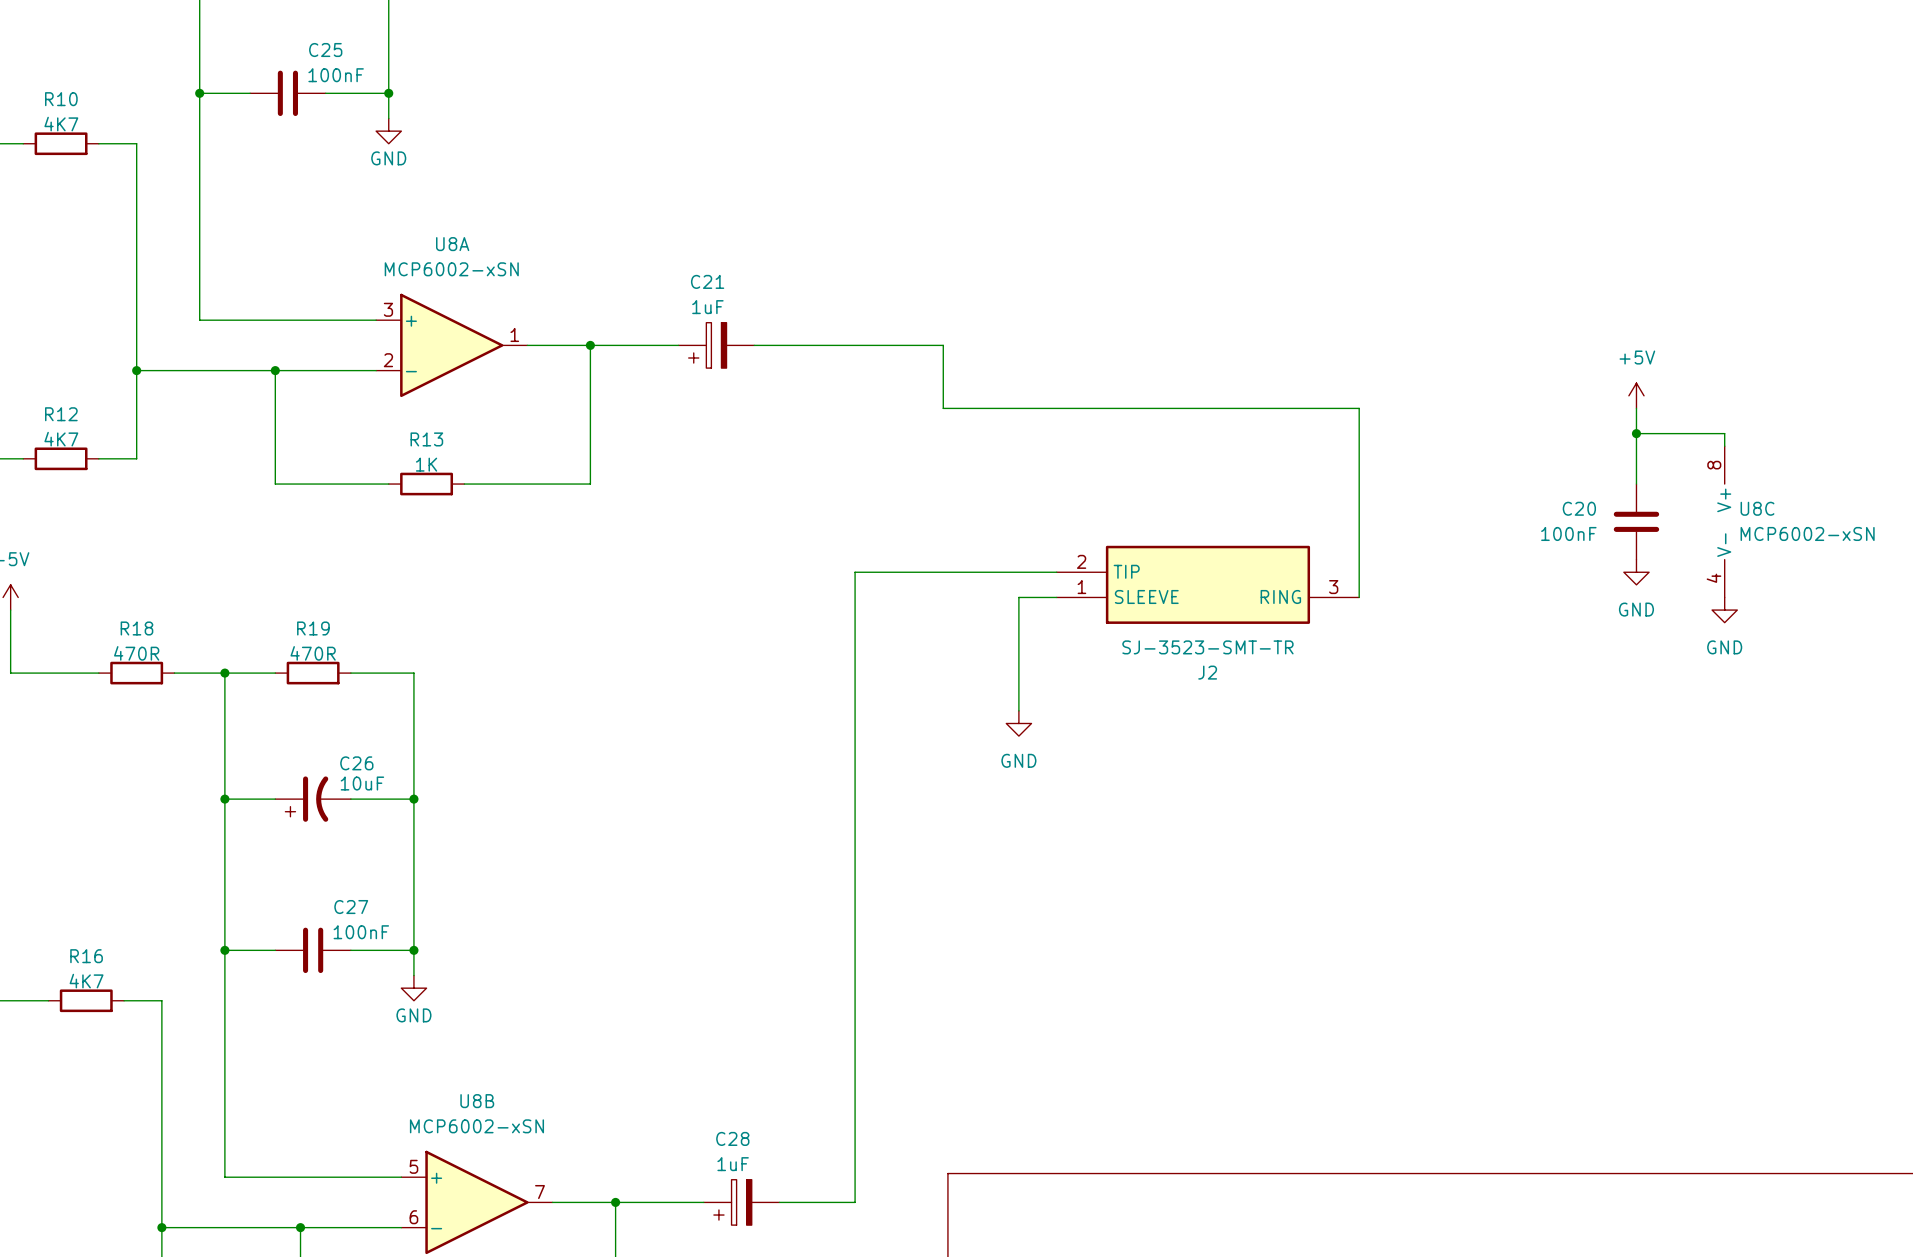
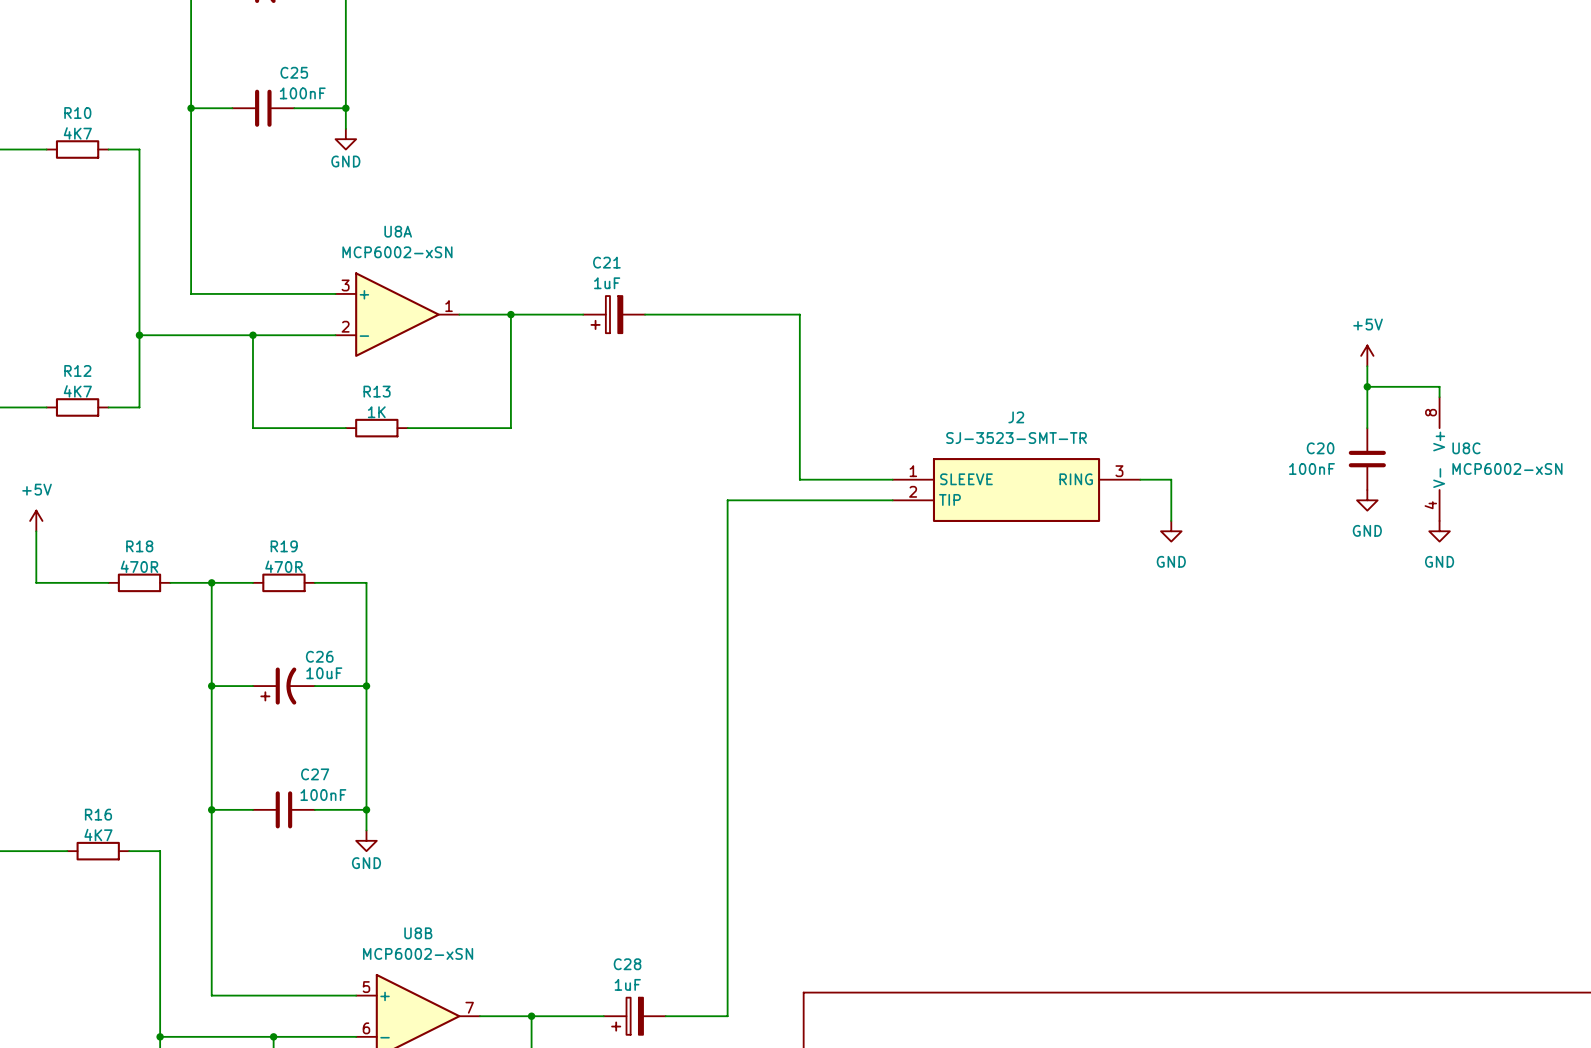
wire: (943, 408) (1359, 408) (1359, 597) -> (799, 366) (799, 479) (892, 479)
wire: none -> (1140, 479) (1171, 479) (1171, 520)
J2 flip: as is (1207, 584) -> up-down (1016, 490)
wire: (1056, 597) (1018, 597) (1018, 710) -> none
power symbol: none -> GND (1171, 531)
power symbol: GND (1018, 723) -> none

